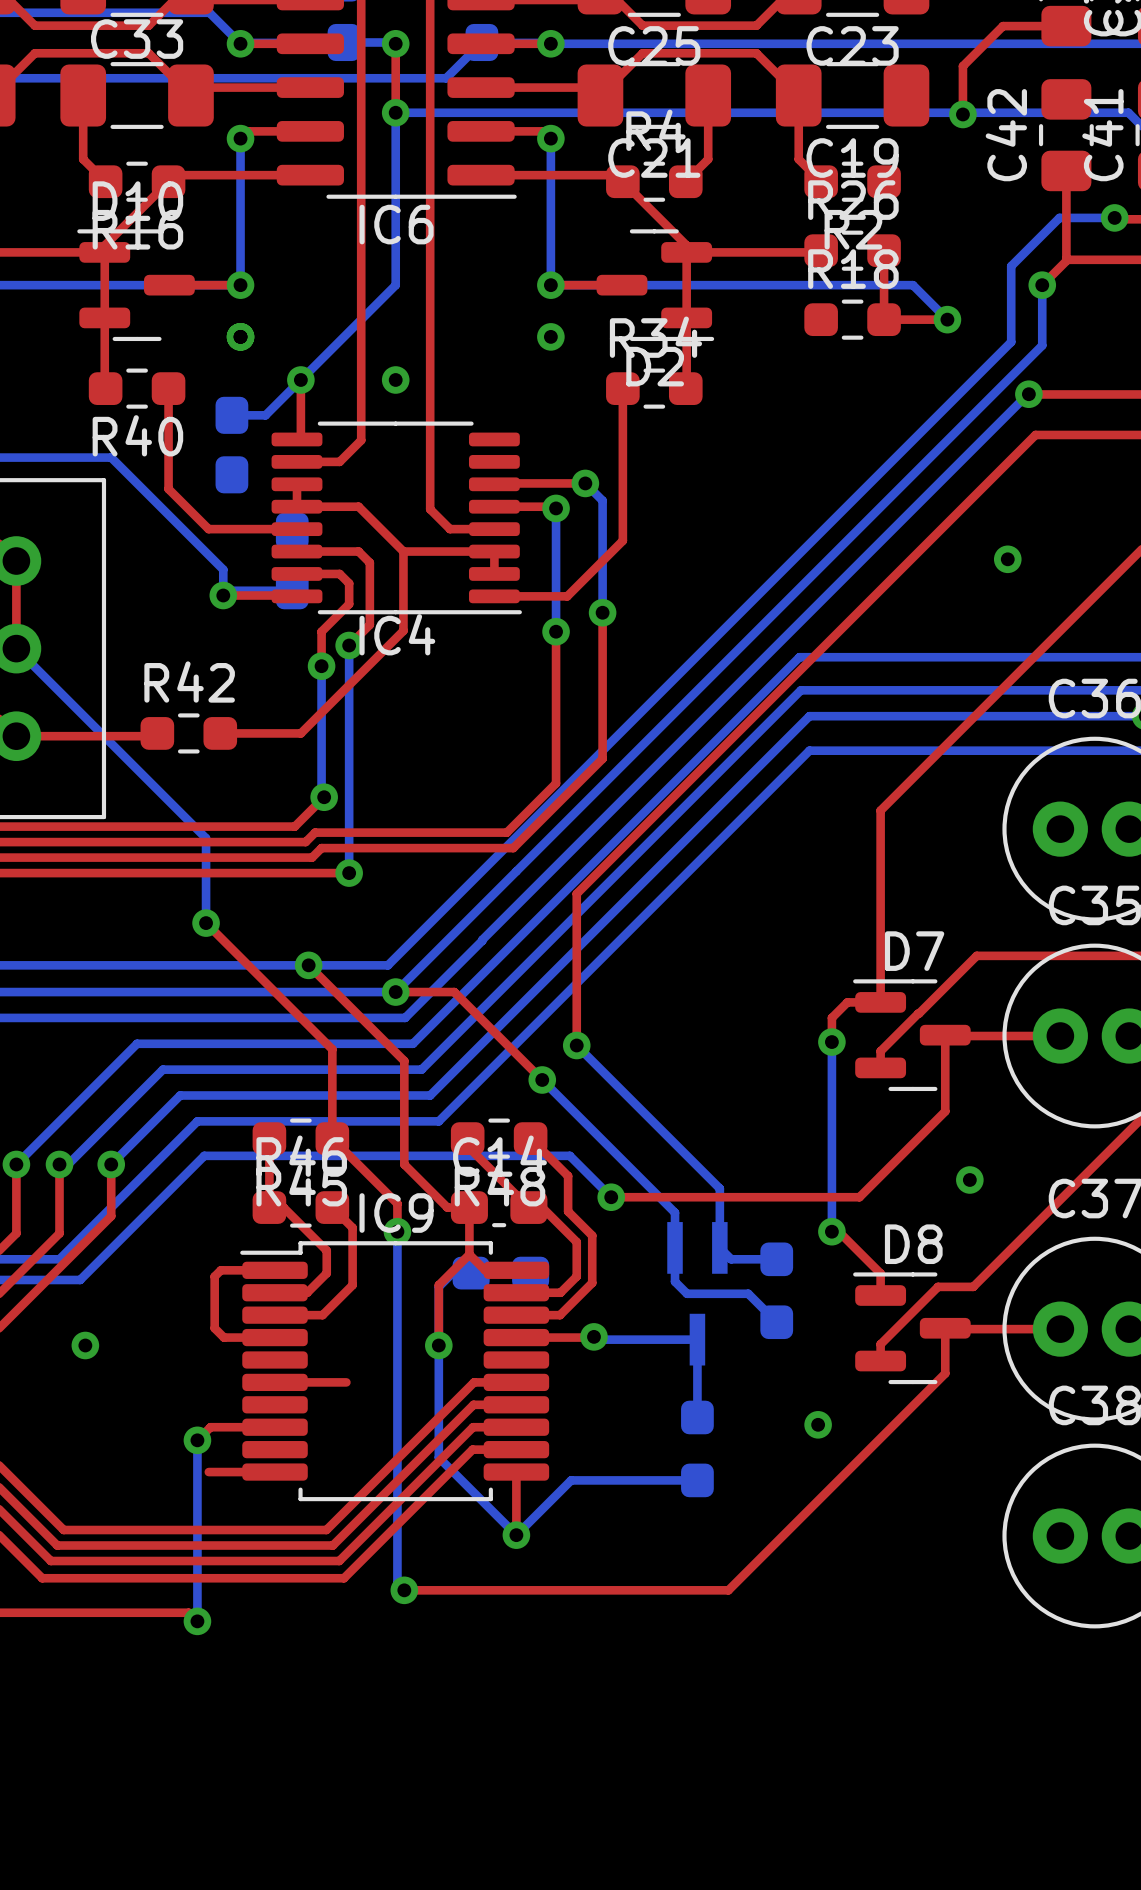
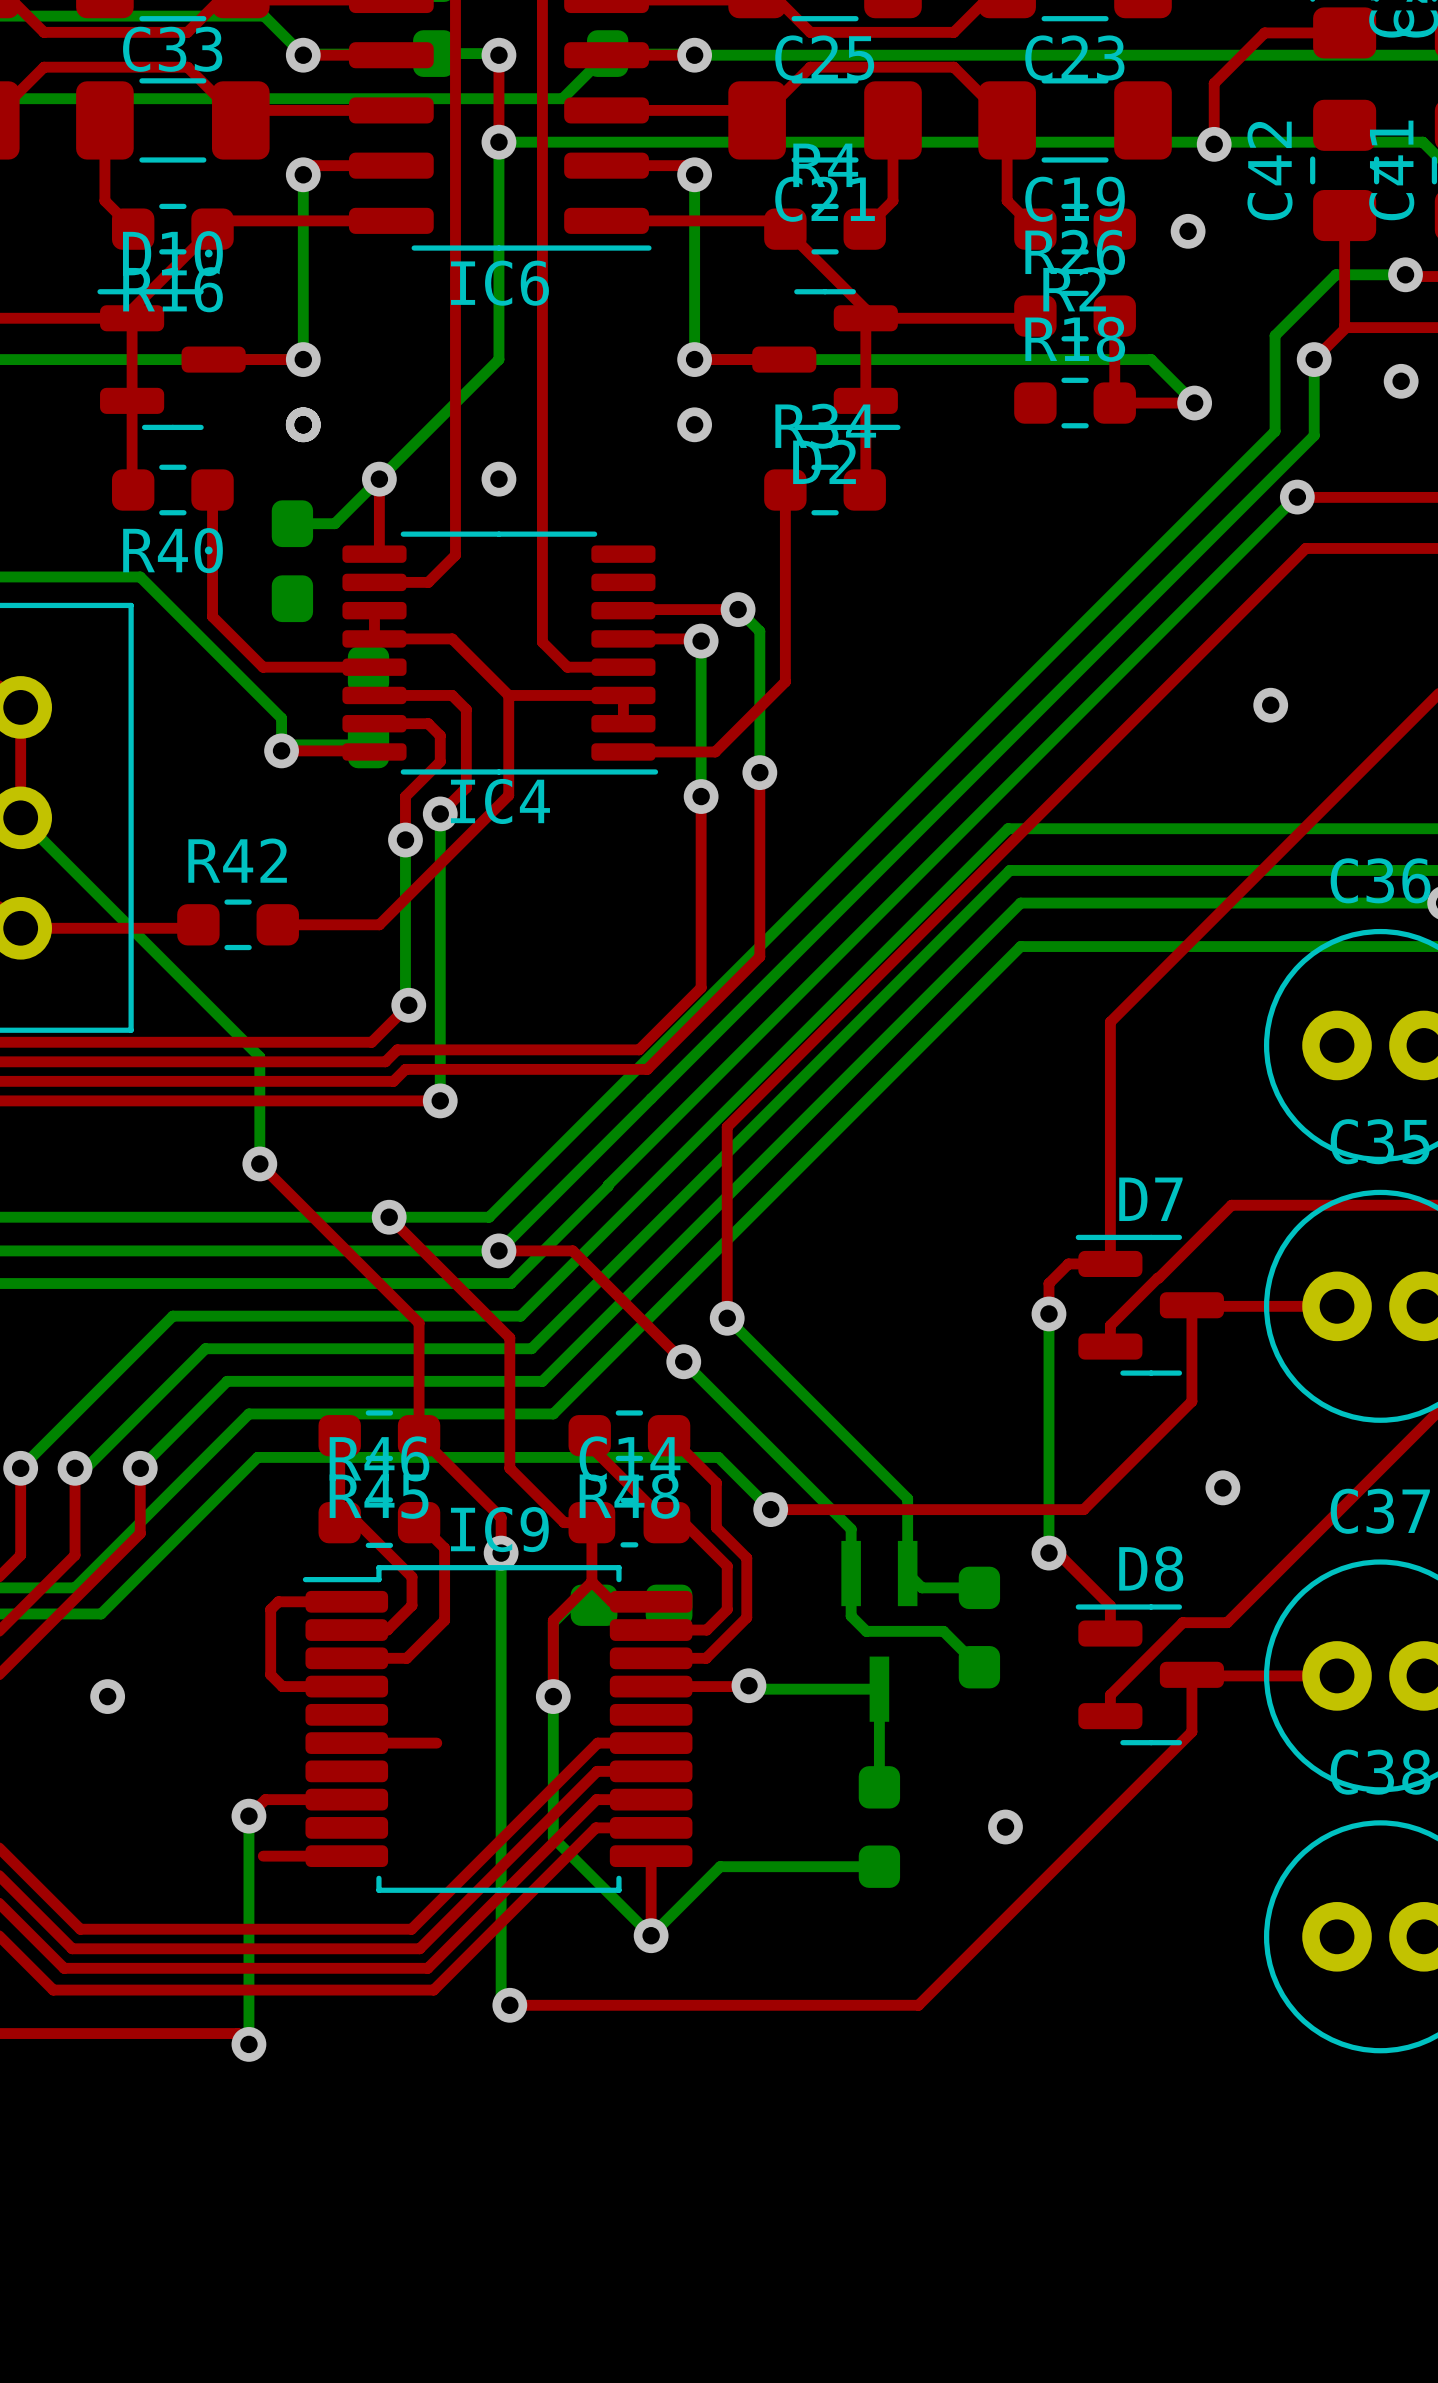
via: none -> (1188, 231)
via: none -> (1401, 381)
via position: (818, 1424) -> (1005, 1827)

